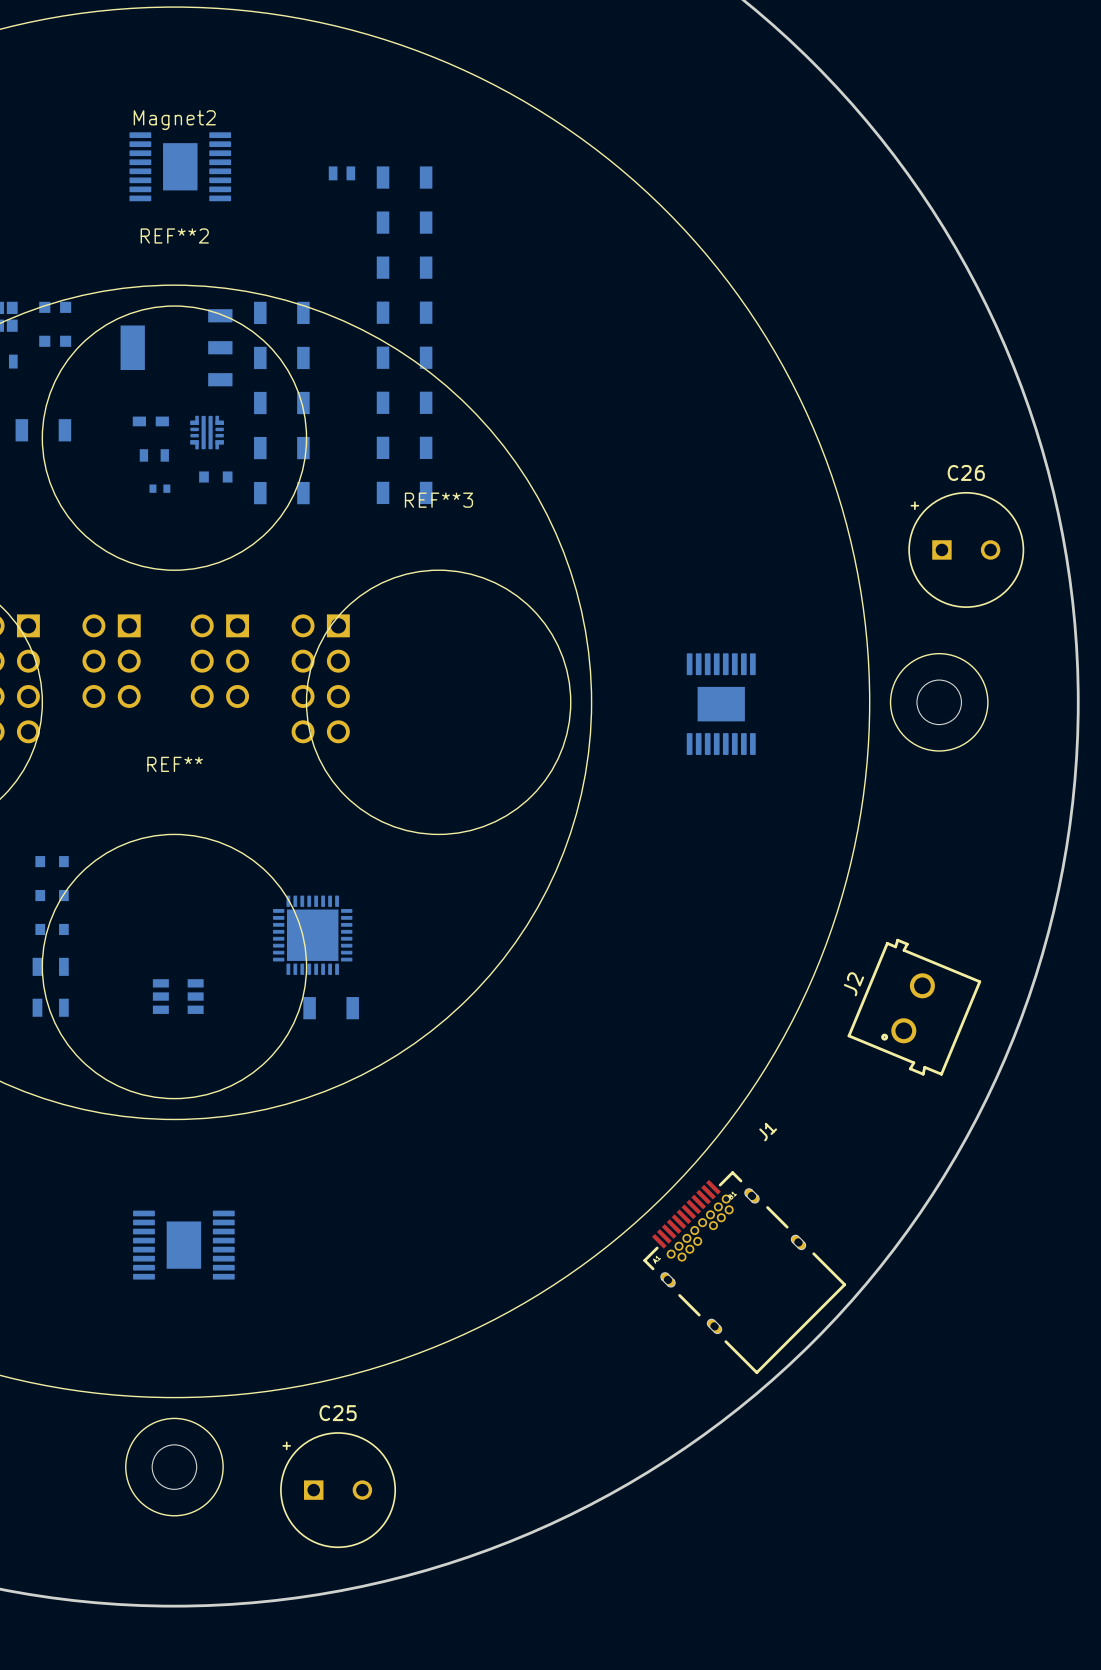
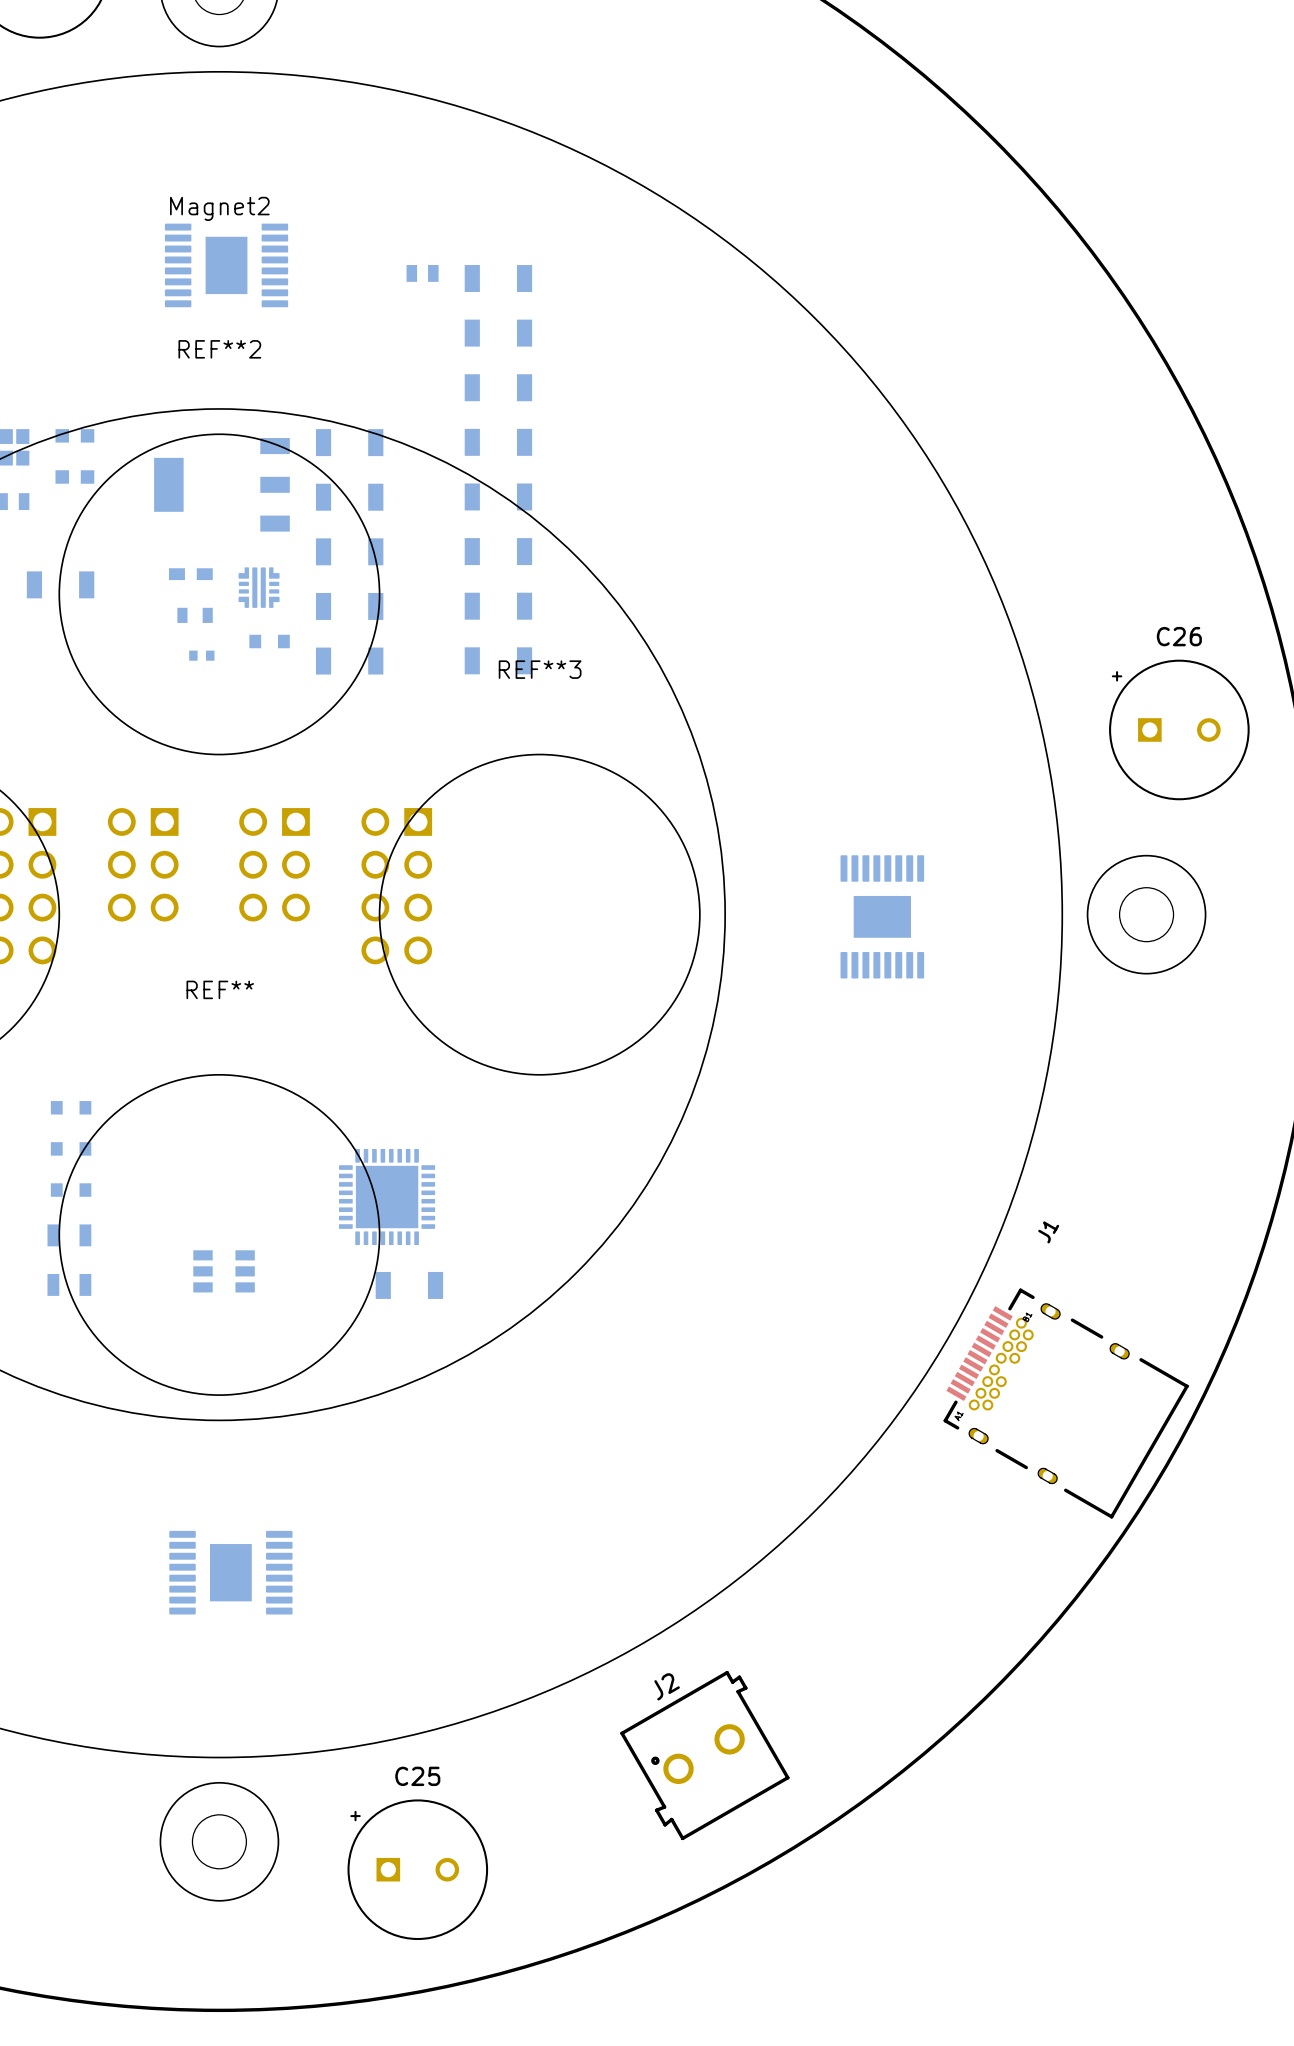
J2 rotation: 0° (914, 1007) -> 37.5° clockwise (704, 1755)
J2 position: (914, 1007) -> (704, 1755)
J1 name position: J1 (768, 1132) -> J1 (1048, 1232)
J1 footprint: [643, 1171, 847, 1374] -> [943, 1288, 1189, 1519]

